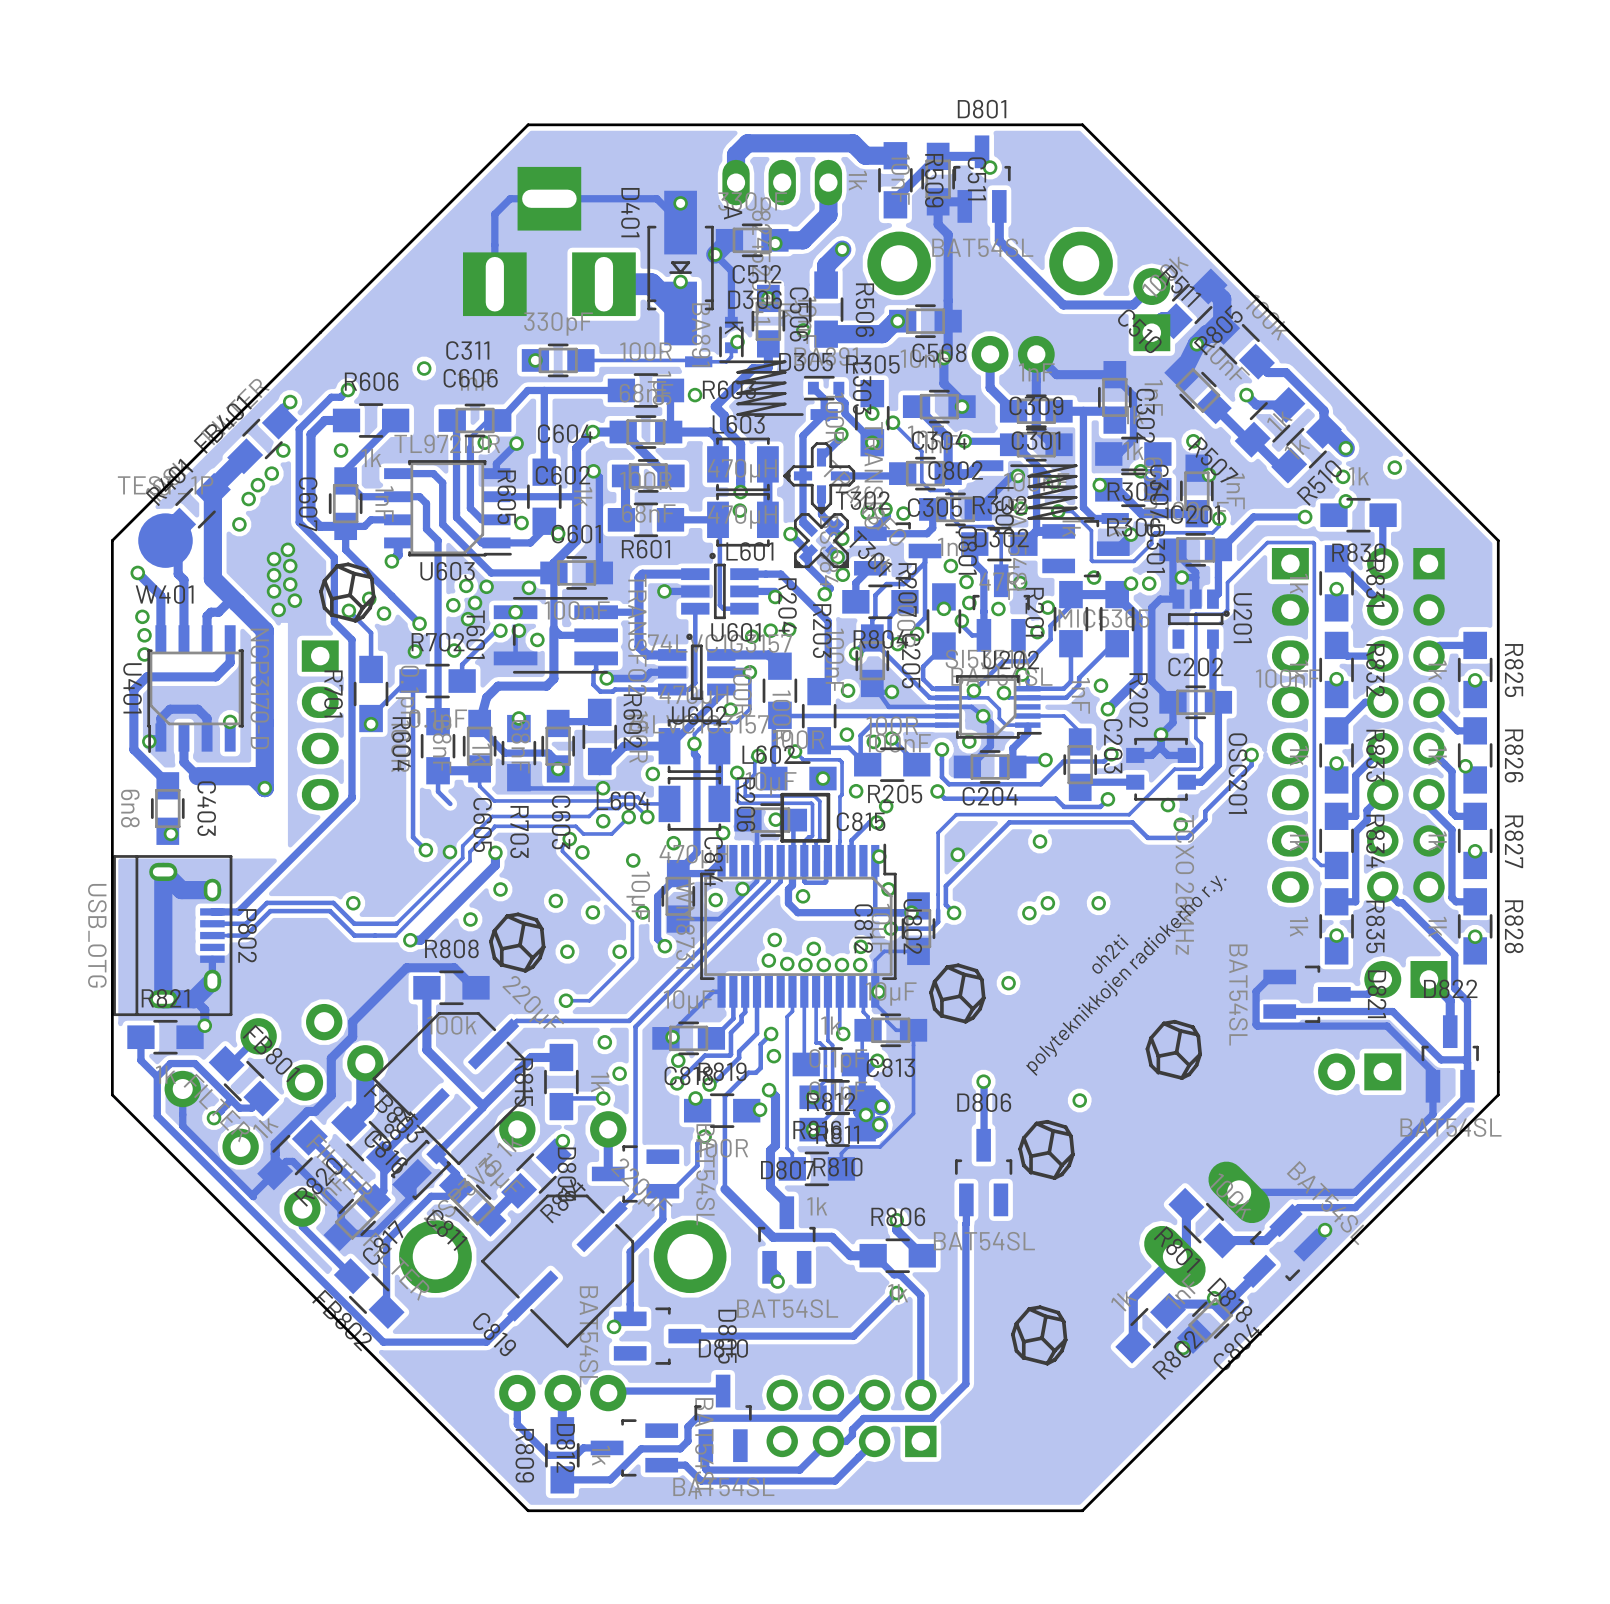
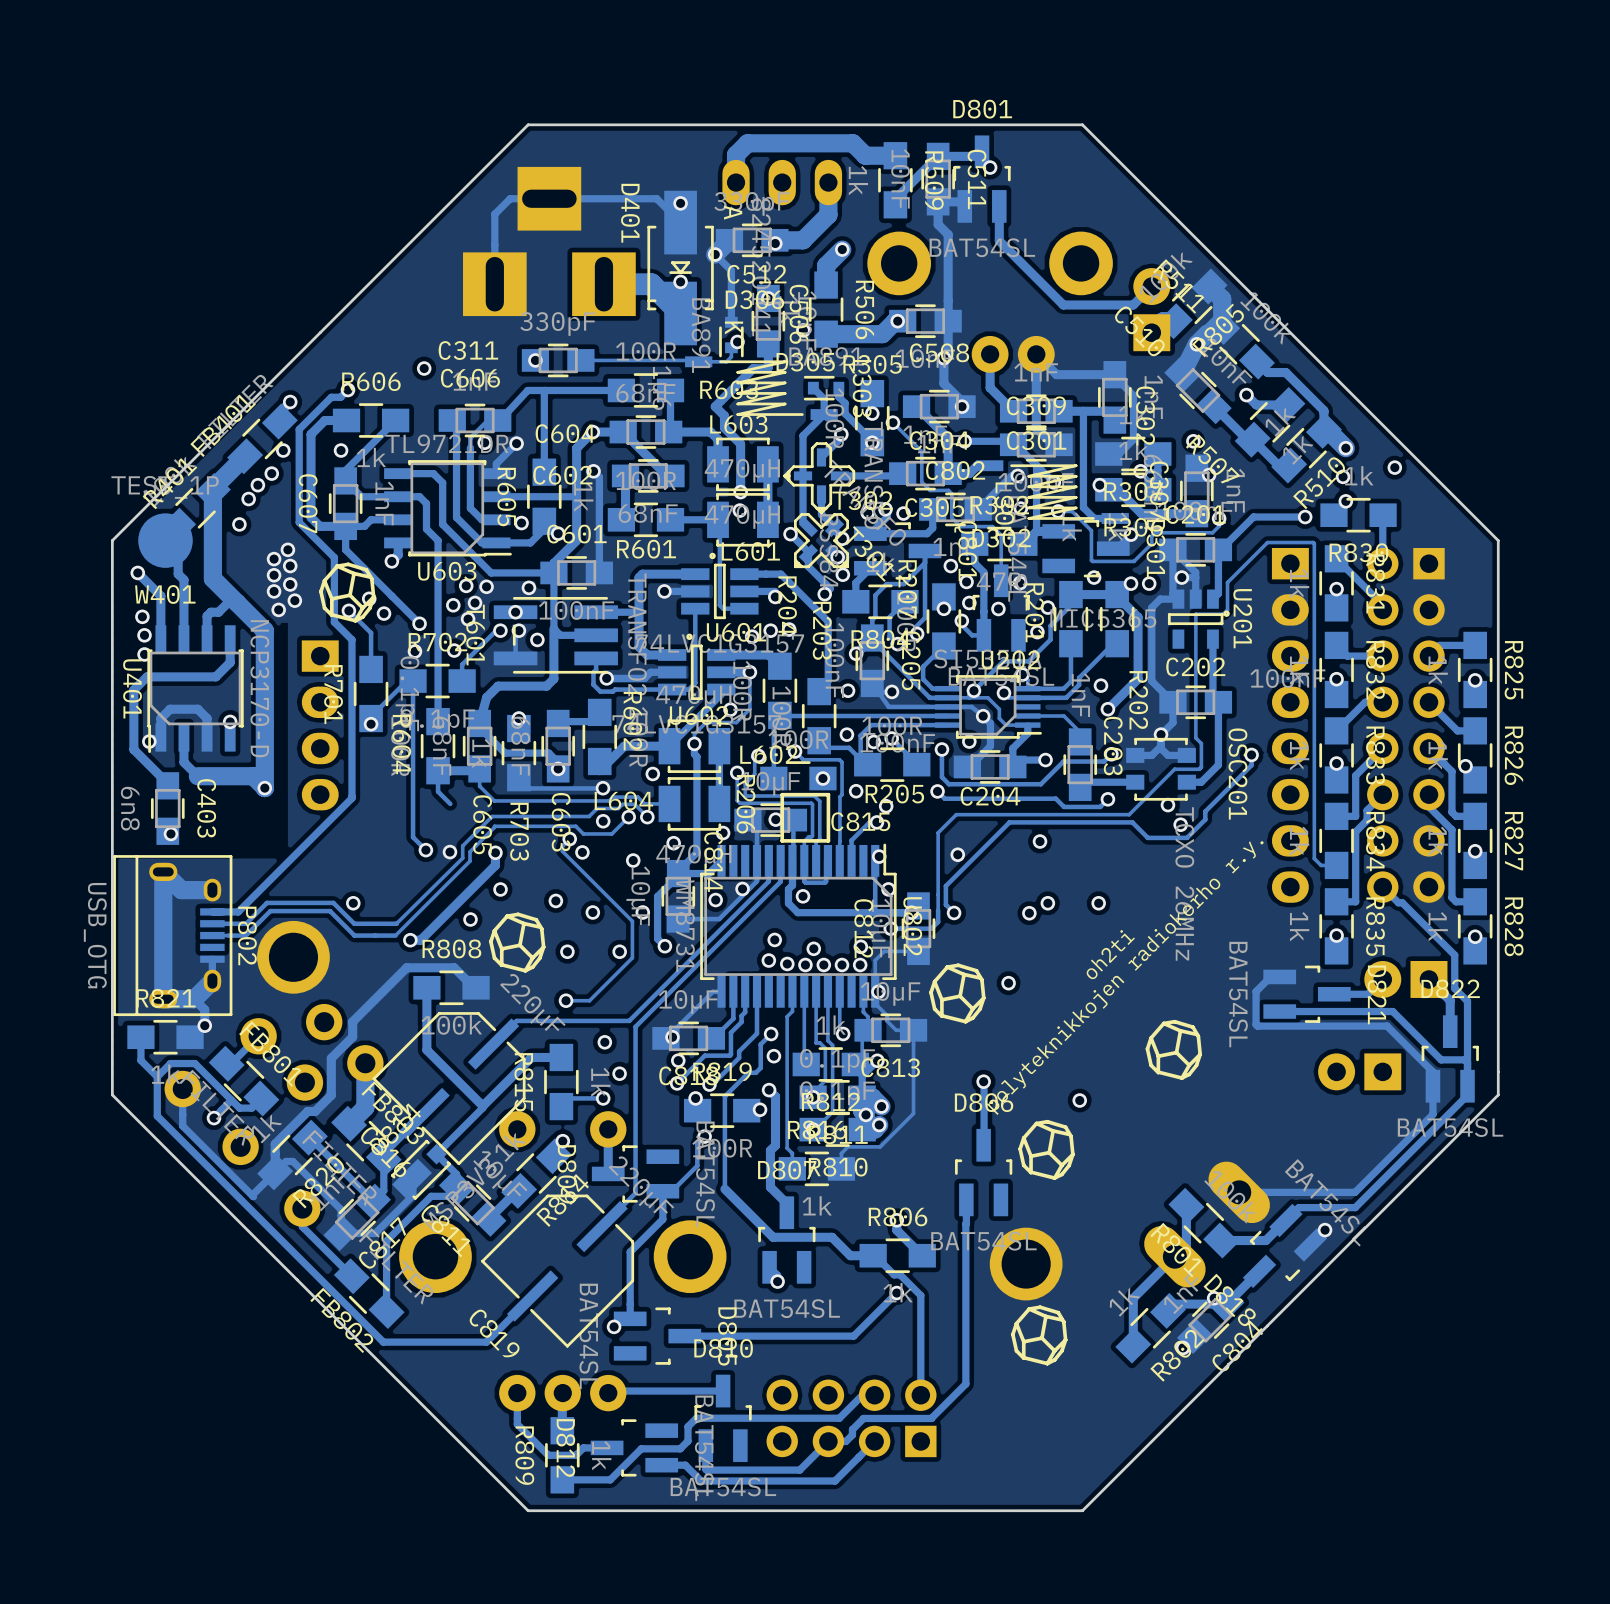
via: (695, 395) -> none
part: none -> (293, 957)
part: none -> (1026, 1264)

